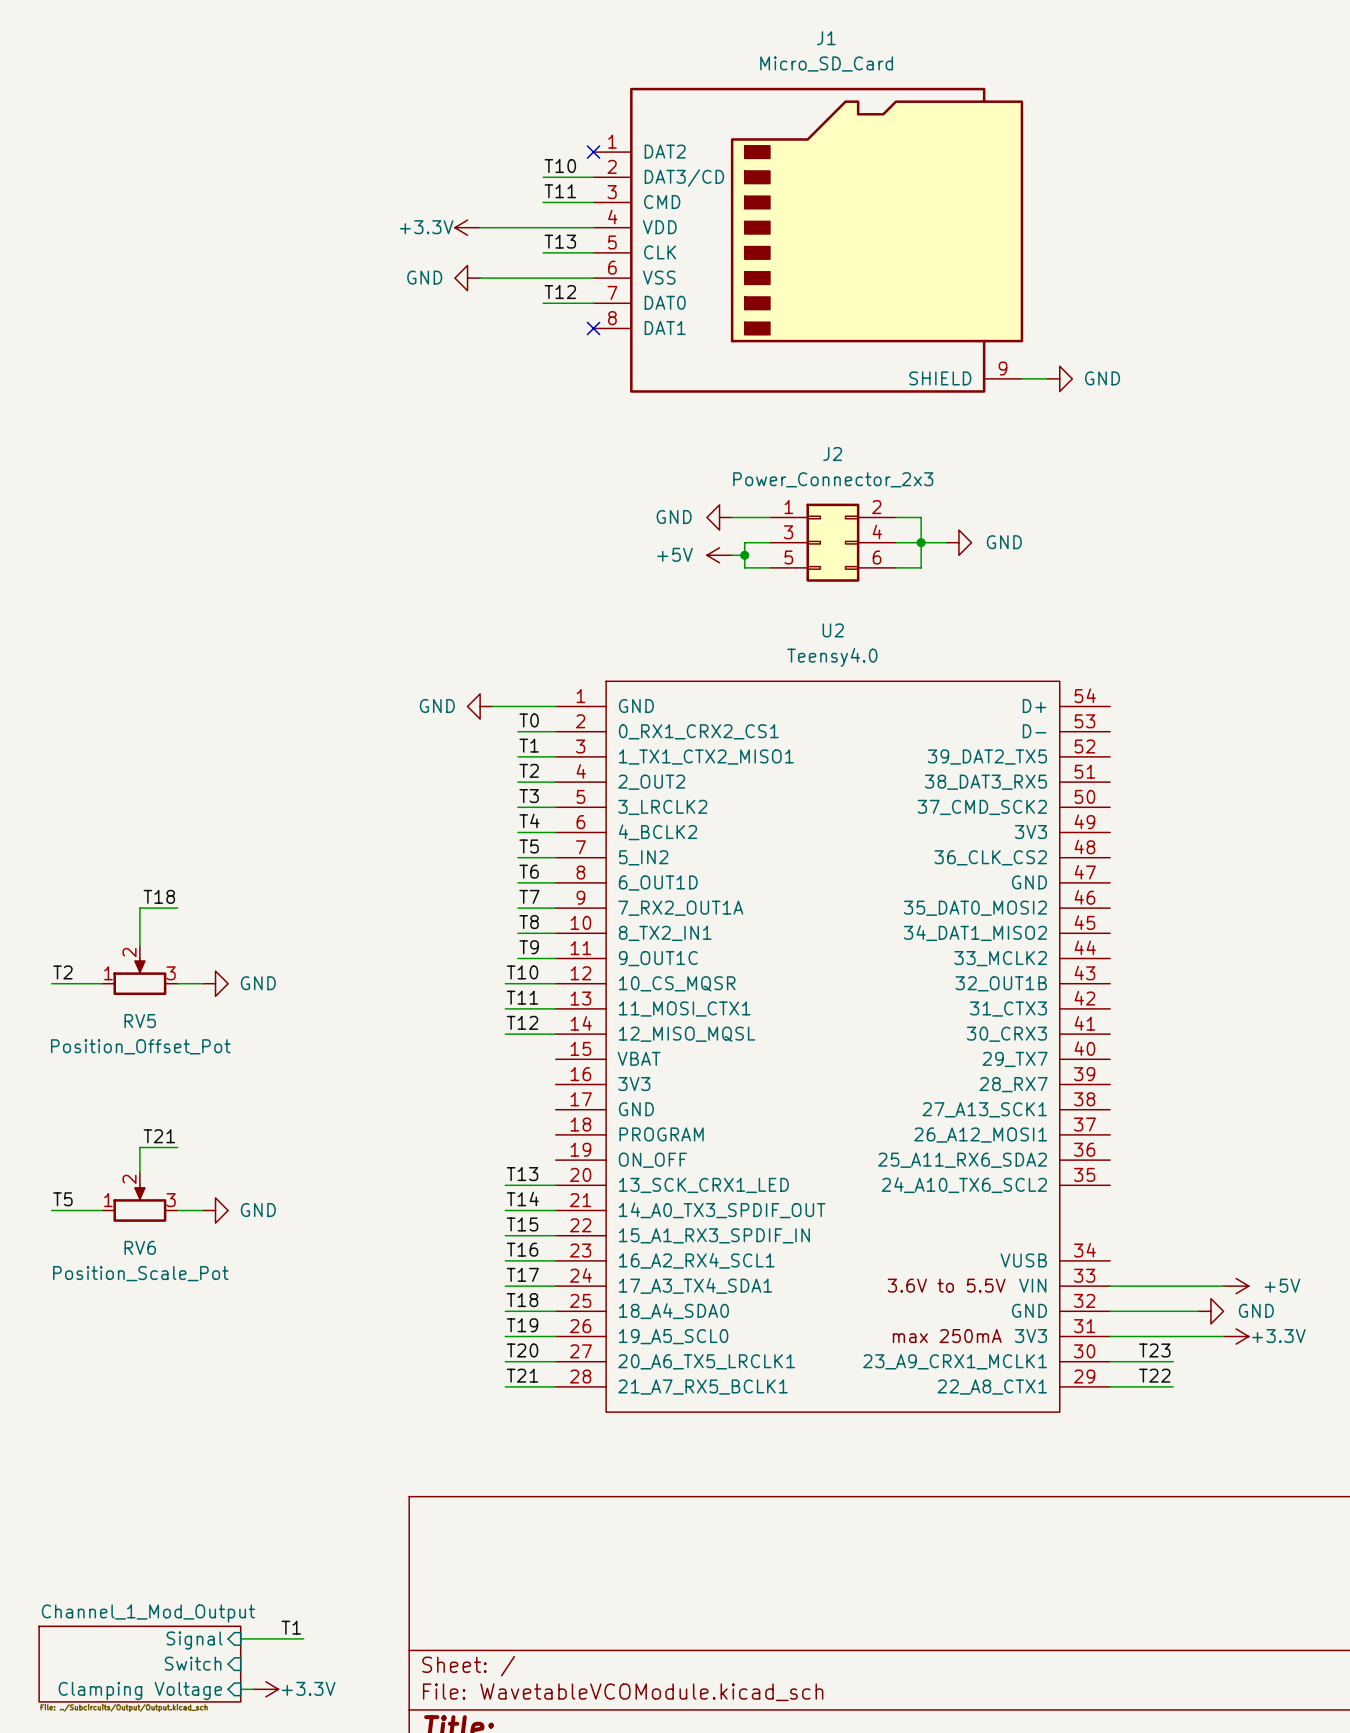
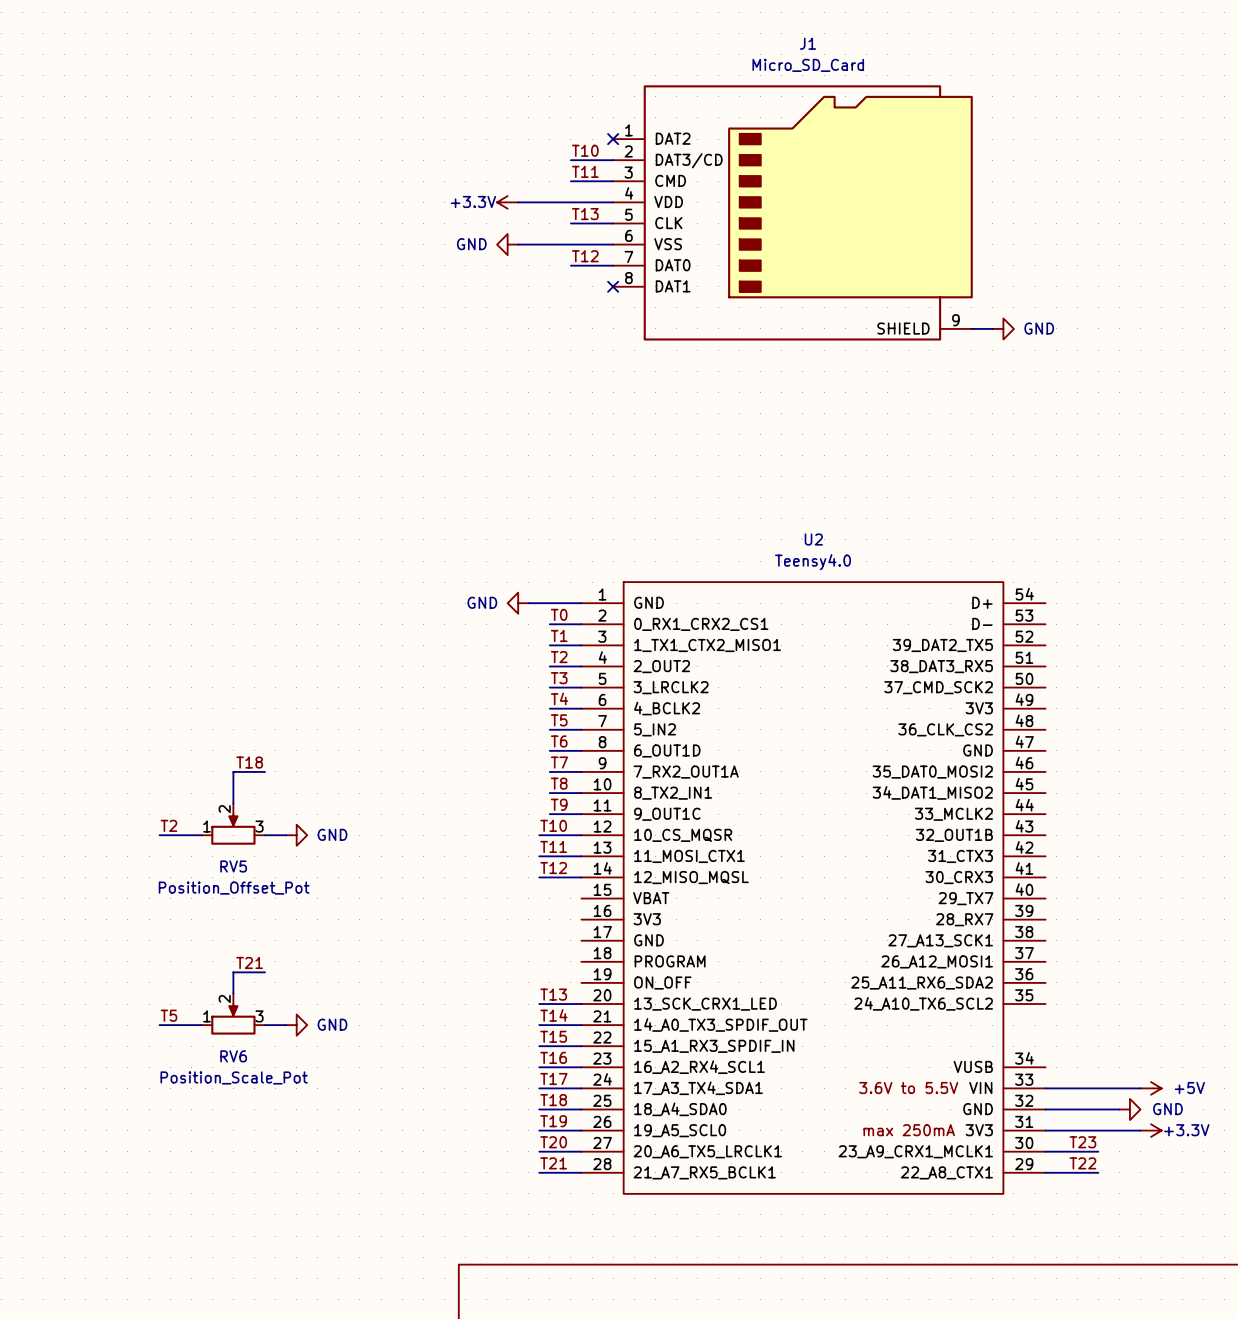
power symbol: GND (719, 517) -> none
wire: (732, 517) (769, 517) -> none
wire: (895, 517) (921, 517) (921, 567) (895, 567) -> none
wire: (769, 542) (744, 542) (744, 567) (769, 567) -> none
J2: Power_Connector_2x3 (832, 542) -> none
wire: (895, 542) (946, 542) -> none
junction: (921, 542) -> none
power symbol: GND (958, 542) -> none
power symbol: +5V (719, 555) -> none
wire: (732, 555) (744, 555) -> none
junction: (744, 555) -> none

